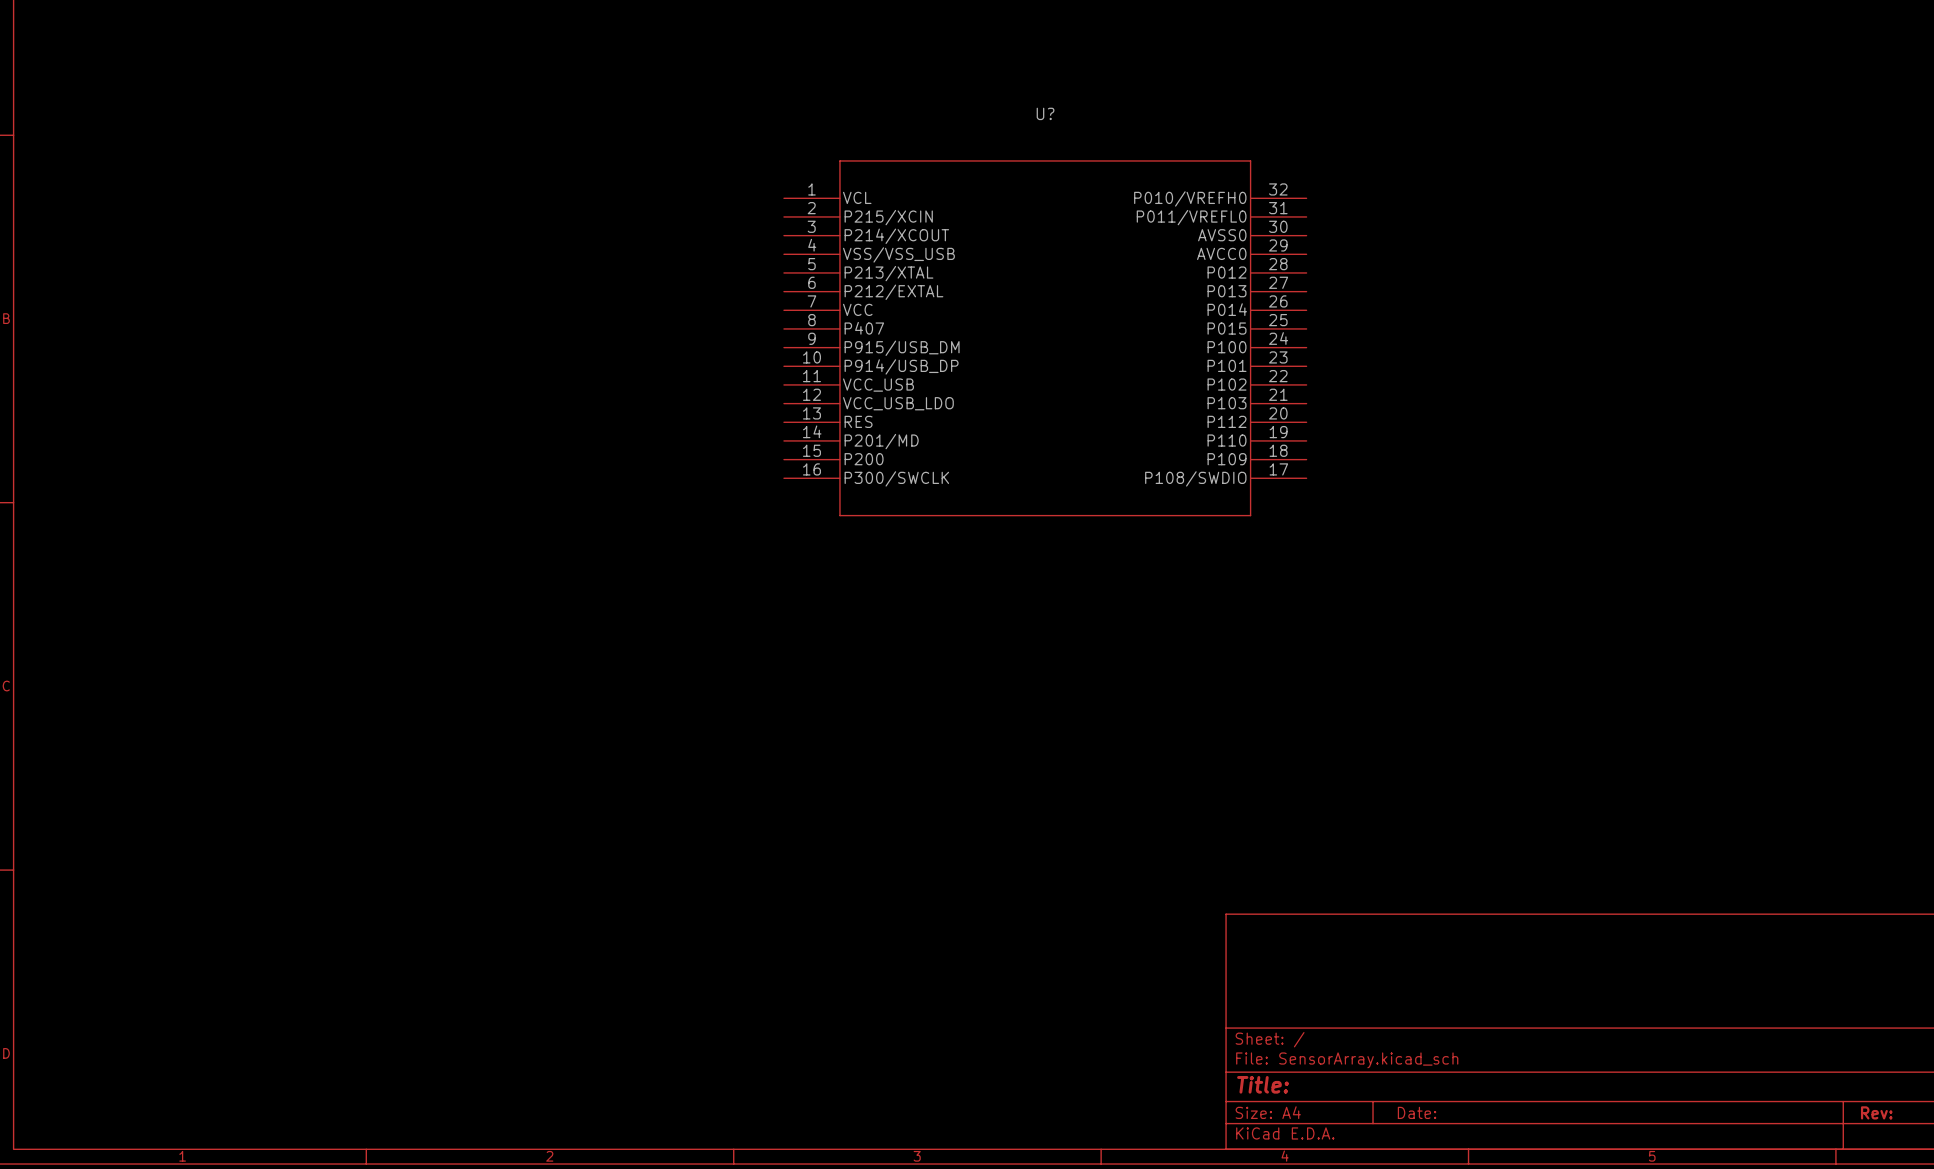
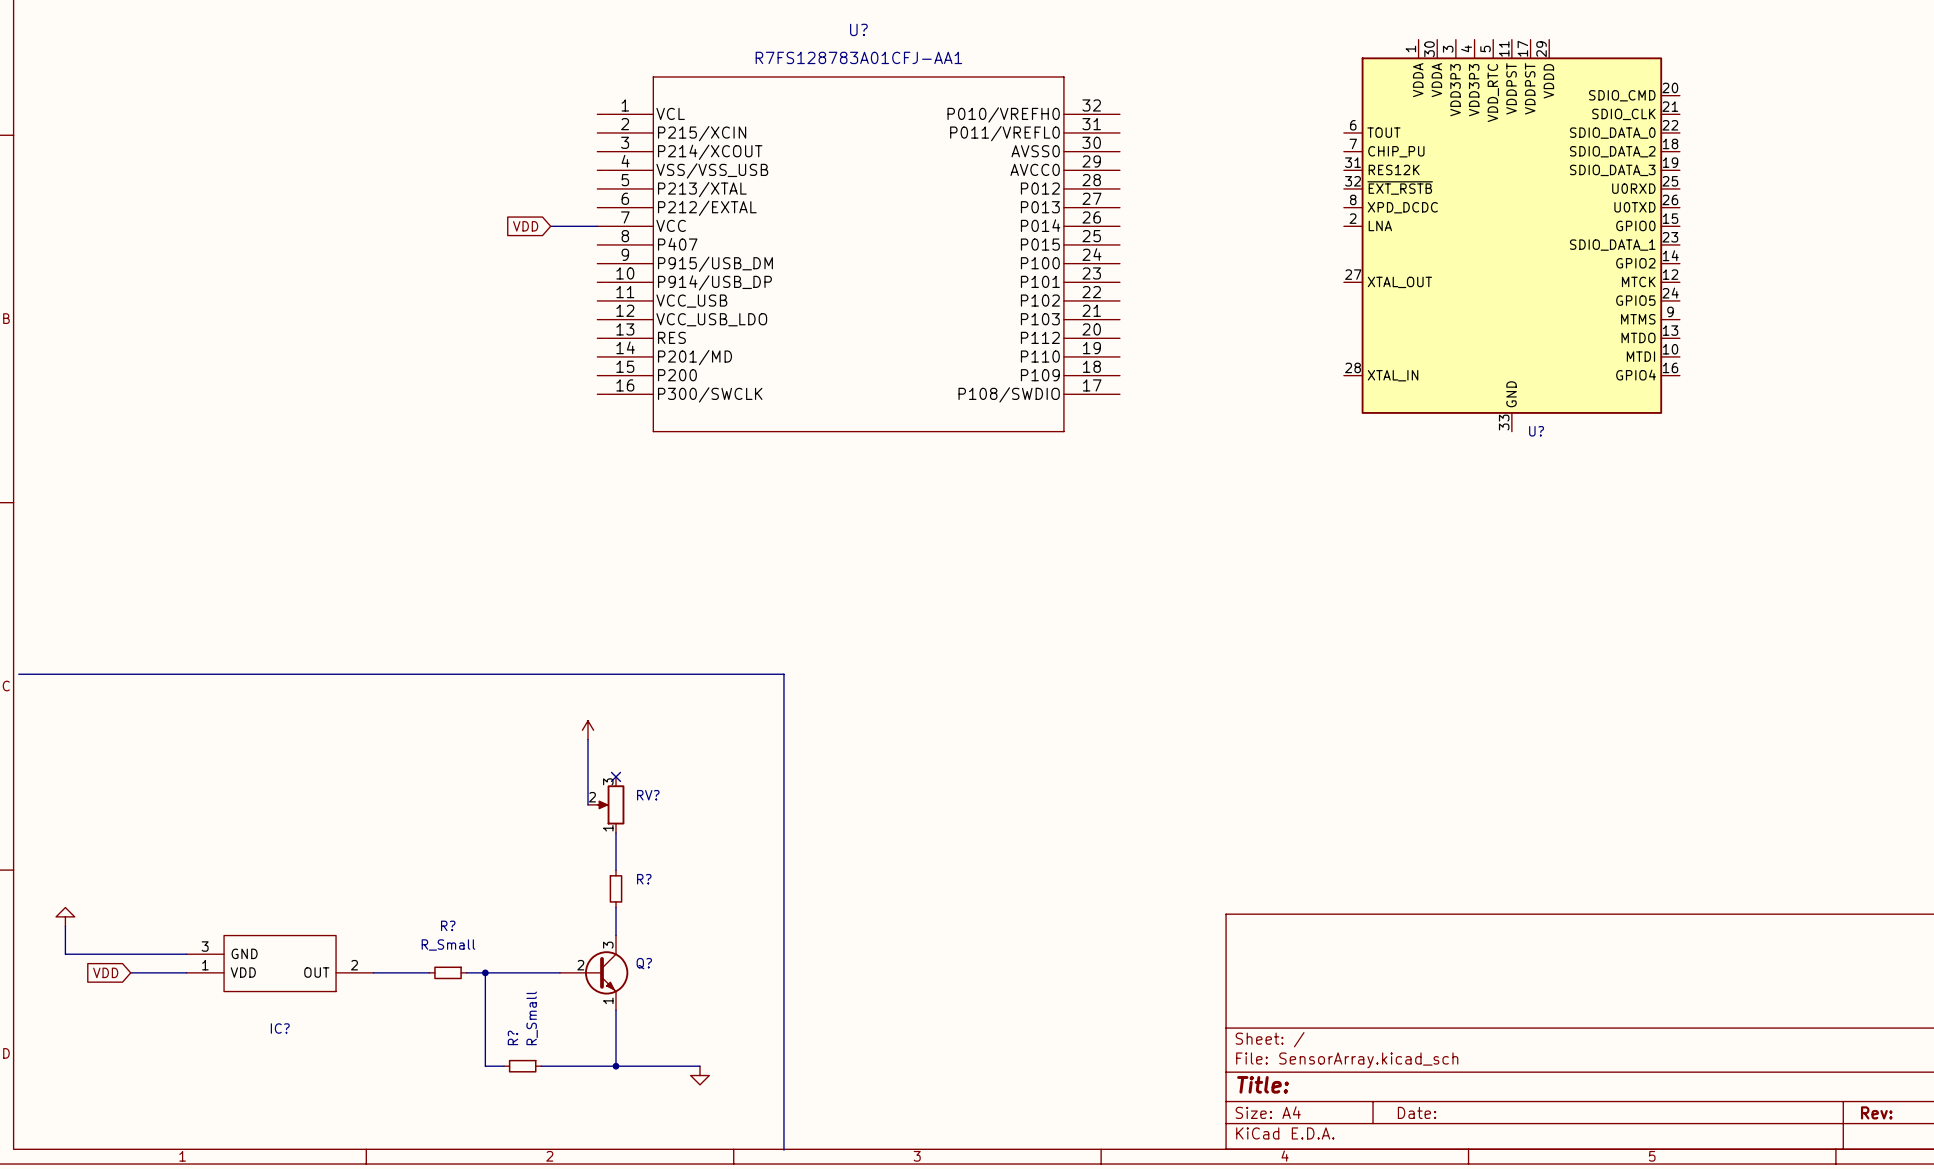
global label: none -> VDD (525, 226)
wire: none -> (550, 226) (597, 226)
U?: none -> (1511, 235)
U?: none -> R7FS128783A01CFJ-AA1 (858, 254)
U?: (1045, 338) -> none
line: none -> (18, 674) (783, 674) (783, 1150)
power symbol: none -> (588, 730)
wire: none -> (588, 739) (588, 804)
no-connect mark: none -> (616, 776)
RV?: none -> (606, 804)
wire: none -> (616, 832) (616, 870)
R?: none -> (616, 888)
wire: none -> (616, 907) (616, 935)
power symbol: none -> (65, 916)
wire: none -> (65, 926) (65, 954) (186, 954)
IC?: none -> (280, 963)
global label: none -> VDD (105, 972)
wire: none -> (130, 972) (186, 972)
wire: none -> (373, 972) (429, 972)
R?: none -> R_Small (448, 972)
wire: none -> (466, 972) (560, 972)
wire: none -> (485, 972) (485, 1066) (504, 1066)
junction: none -> (485, 972)
Q?: none -> (594, 972)
wire: none -> (616, 1010) (616, 1066)
R?: none -> R_Small (522, 1066)
wire: none -> (541, 1066) (699, 1066)
junction: none -> (616, 1066)
power symbol: none -> (699, 1075)

